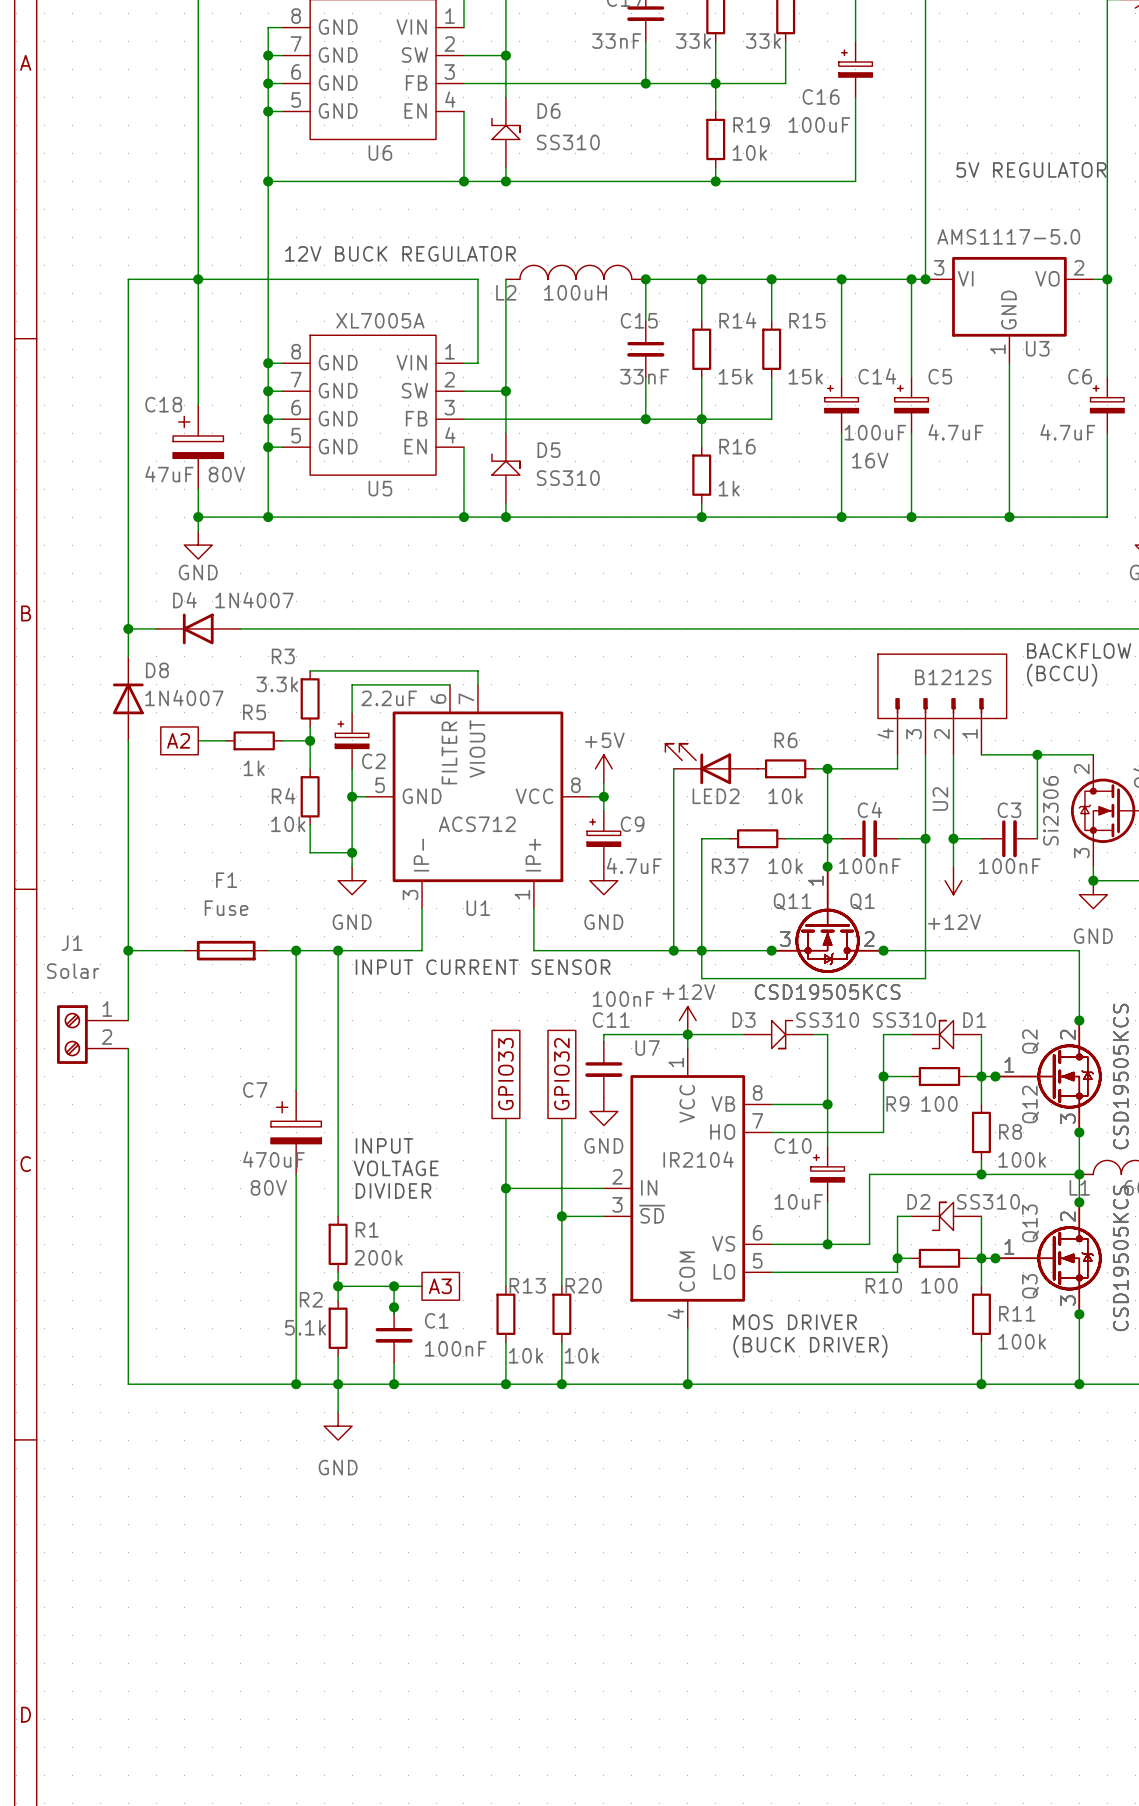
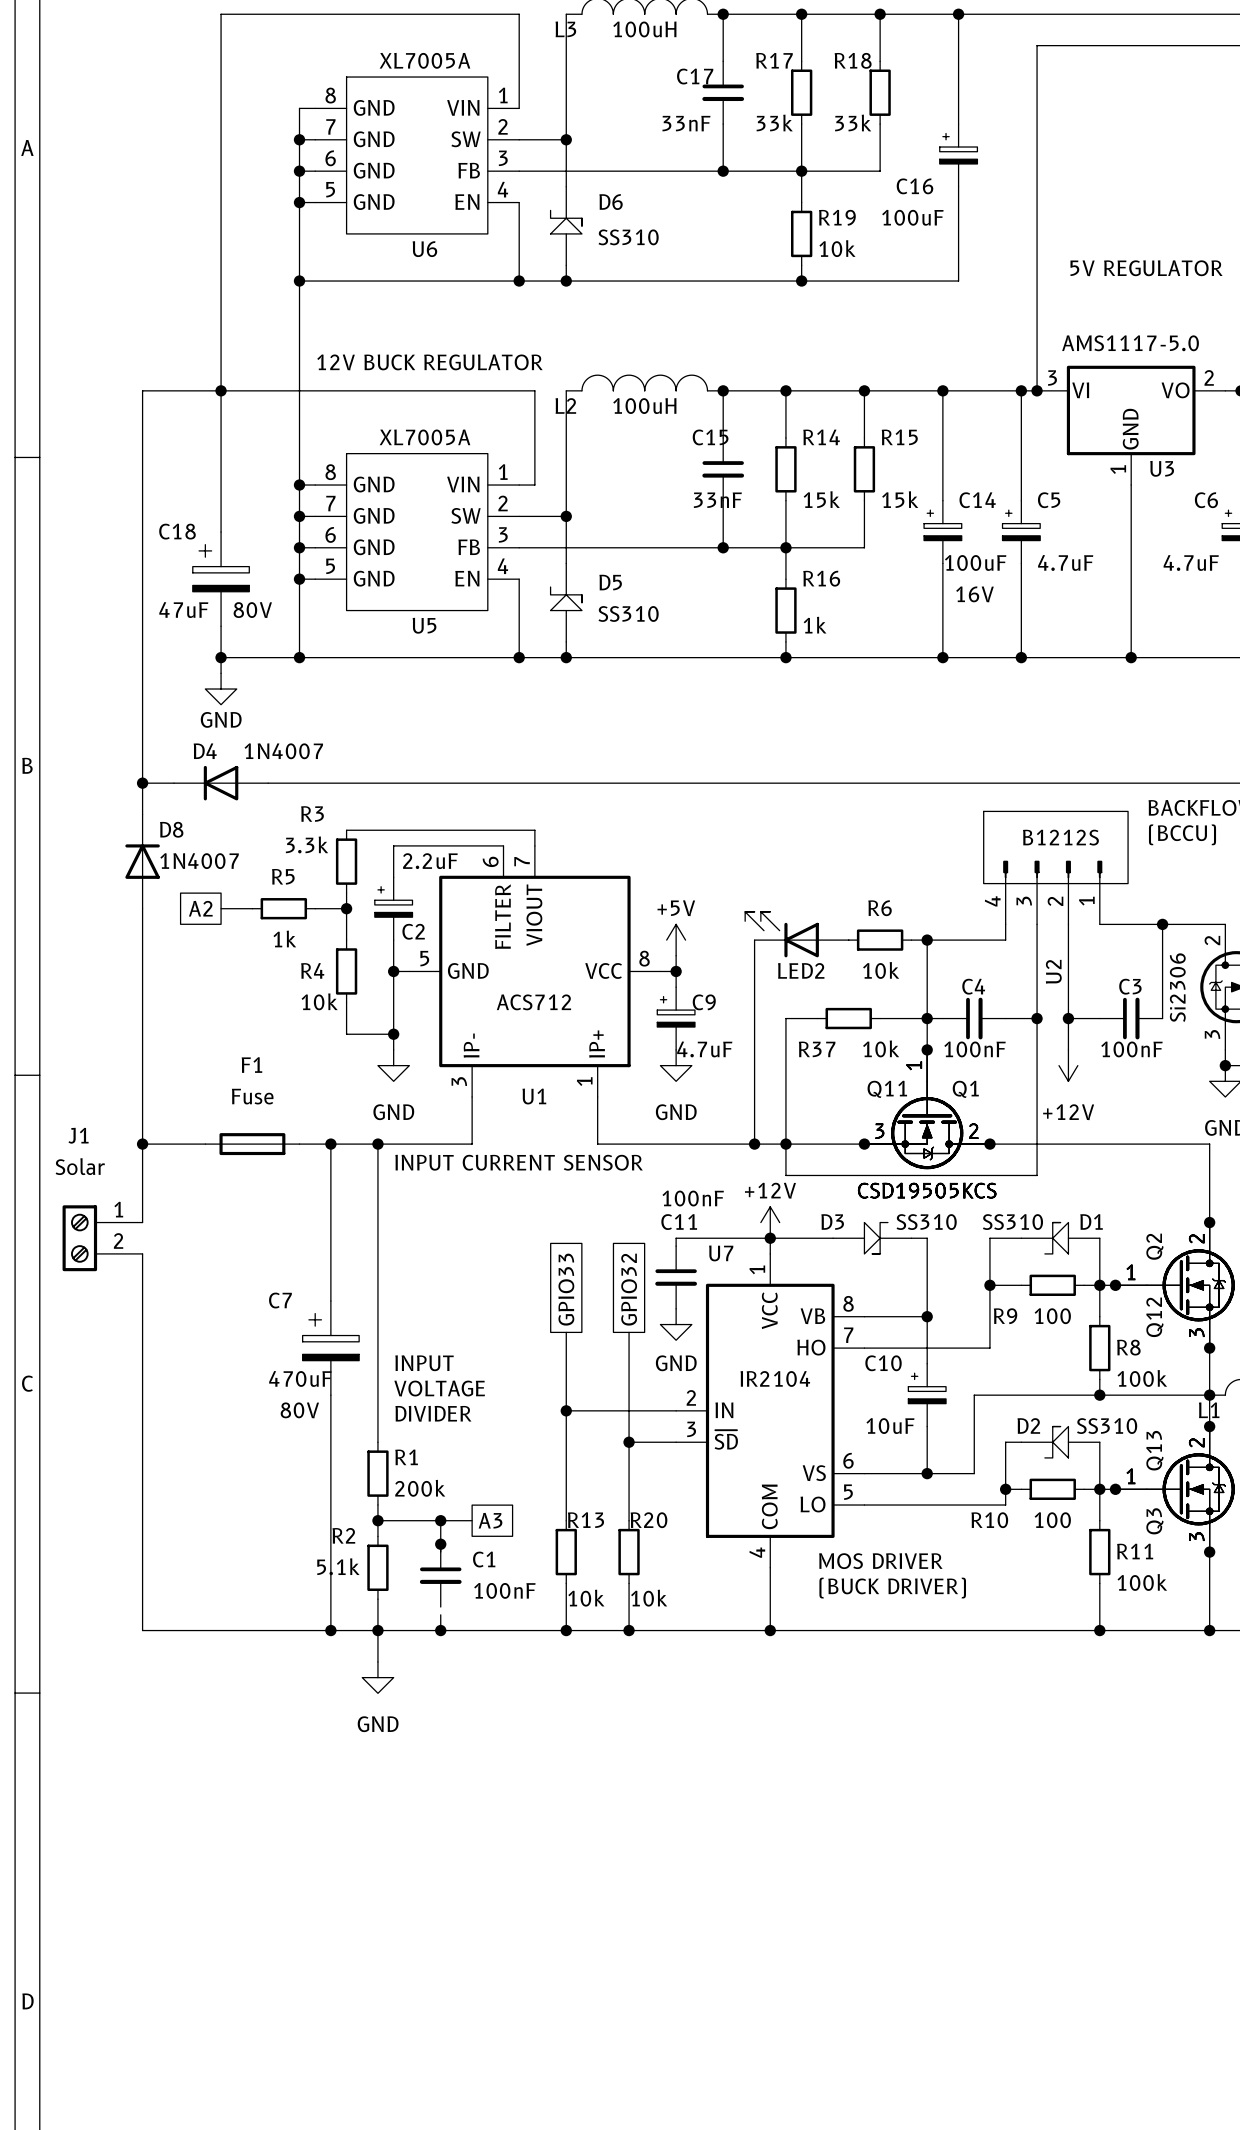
wire: (394, 1363) (394, 1370) -> none

